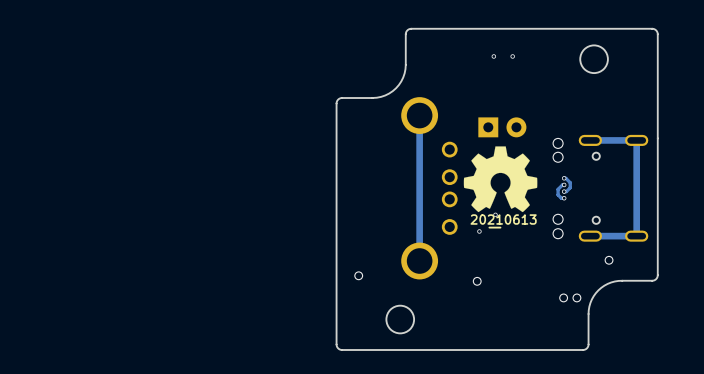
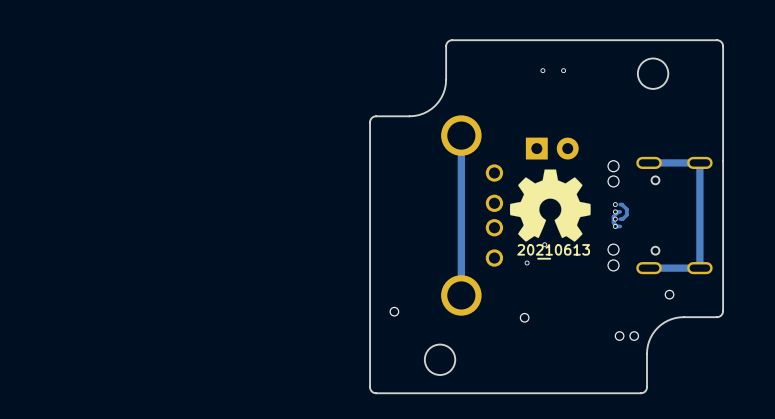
via: none -> (615, 204)
via: (564, 178) -> none
via: none -> (615, 211)
via: (564, 184) -> none
via: none -> (615, 219)
via: (564, 191) -> none
via: none -> (615, 226)
via: (564, 198) -> none

